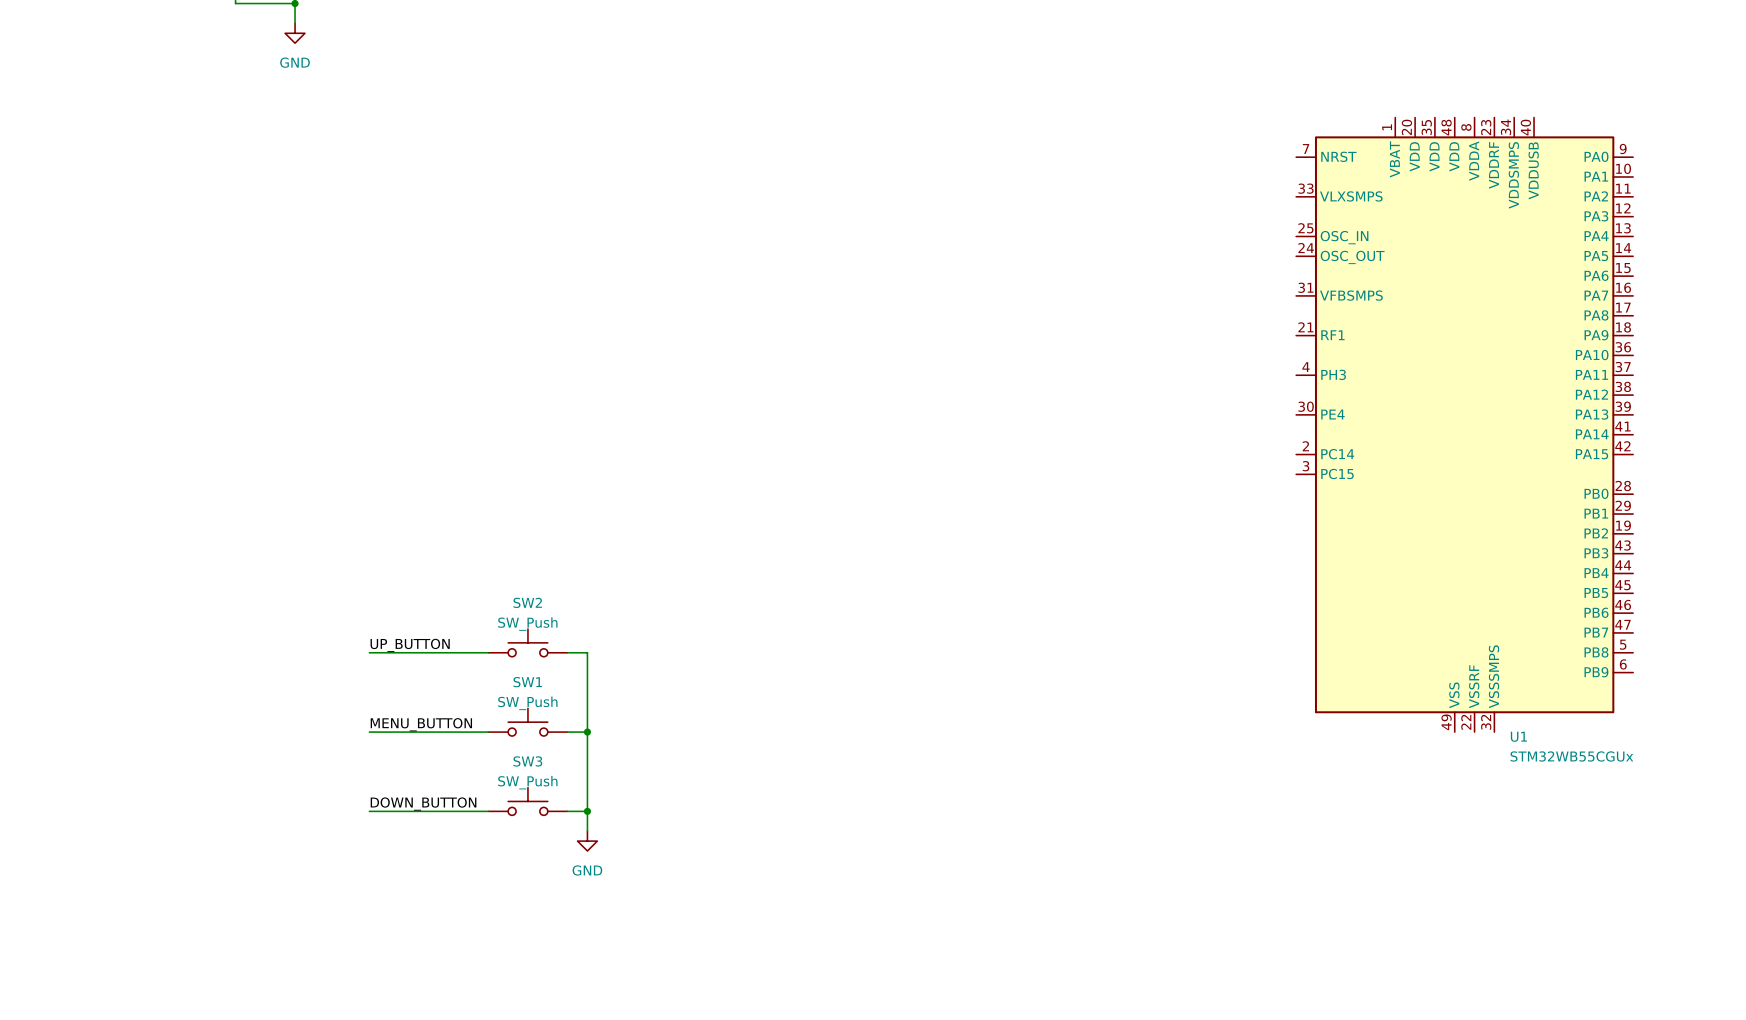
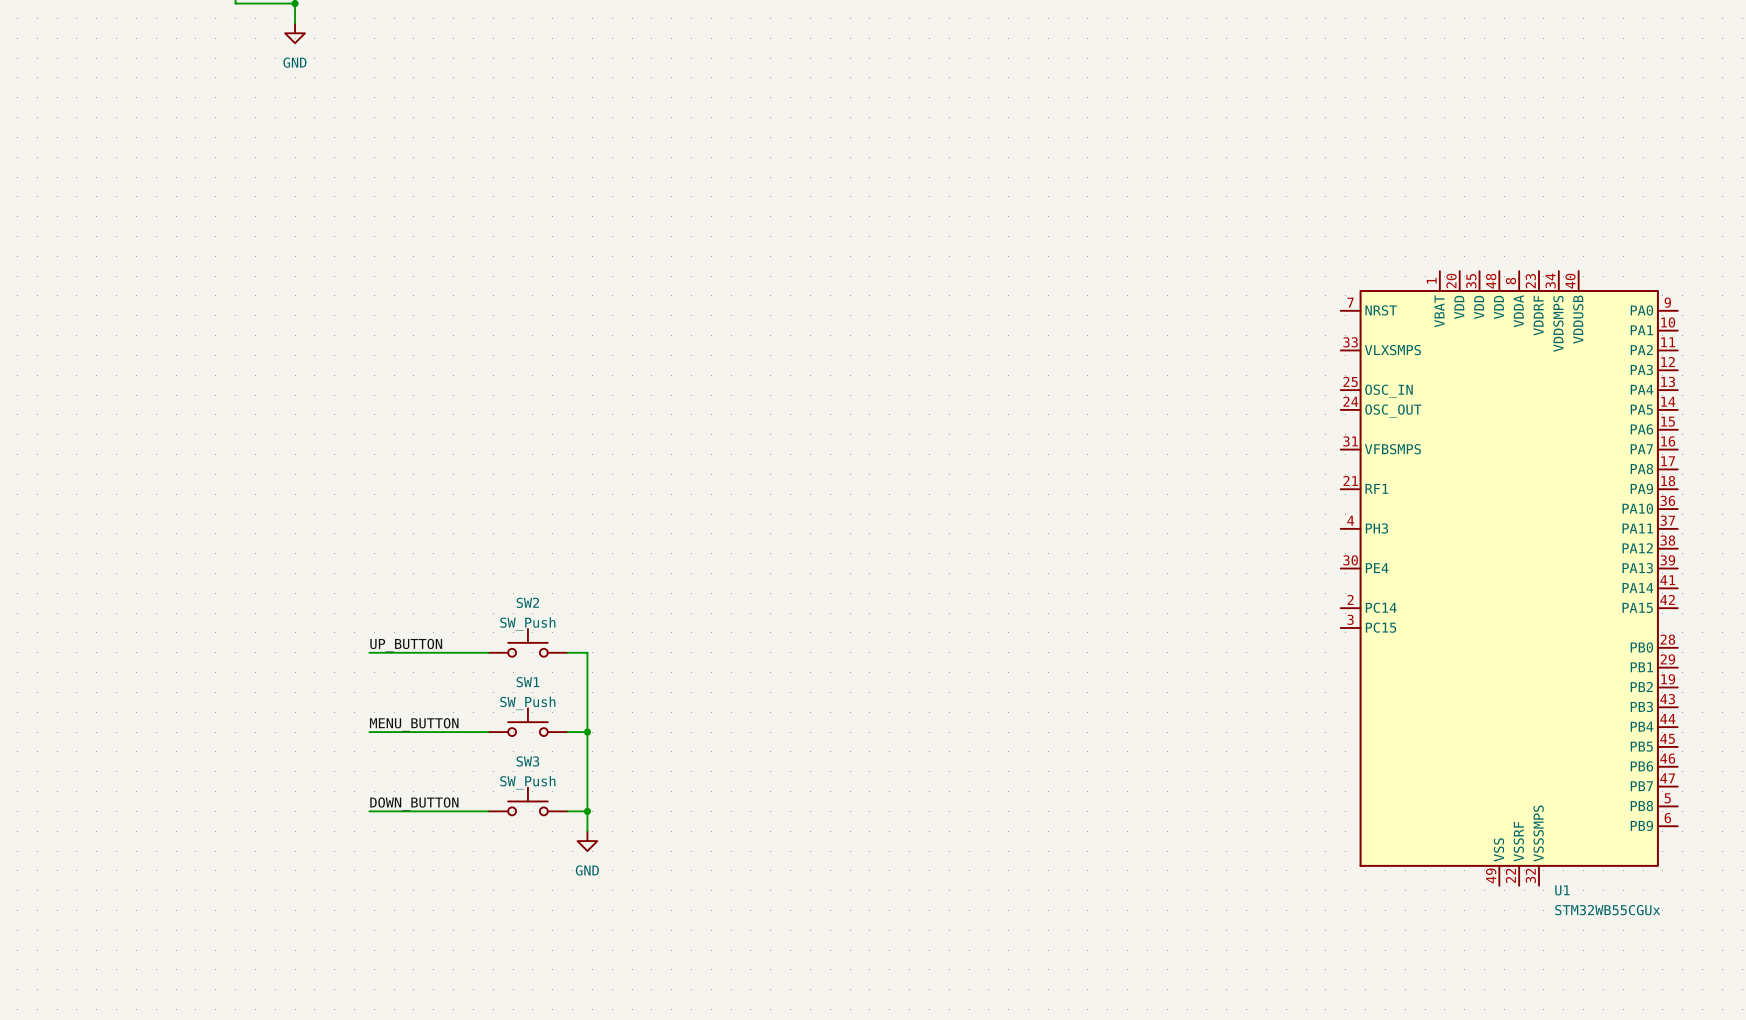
U1 position: (1464, 424) -> (1509, 578)

